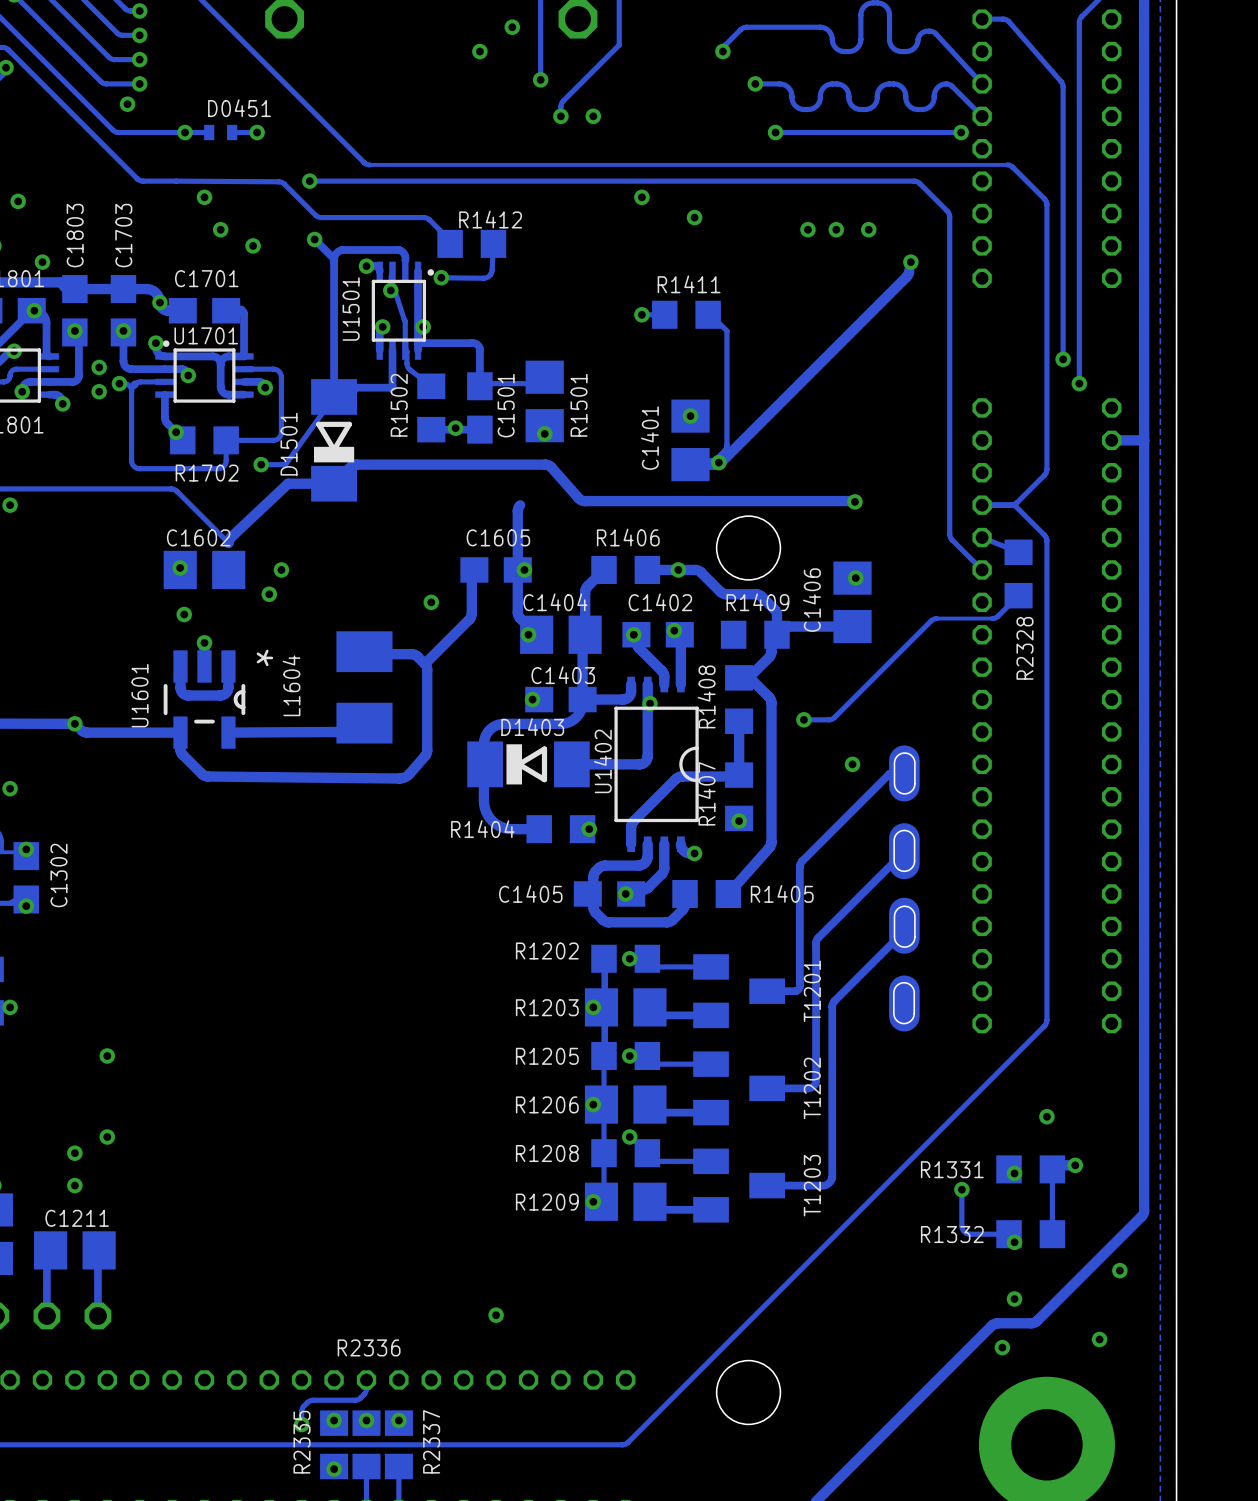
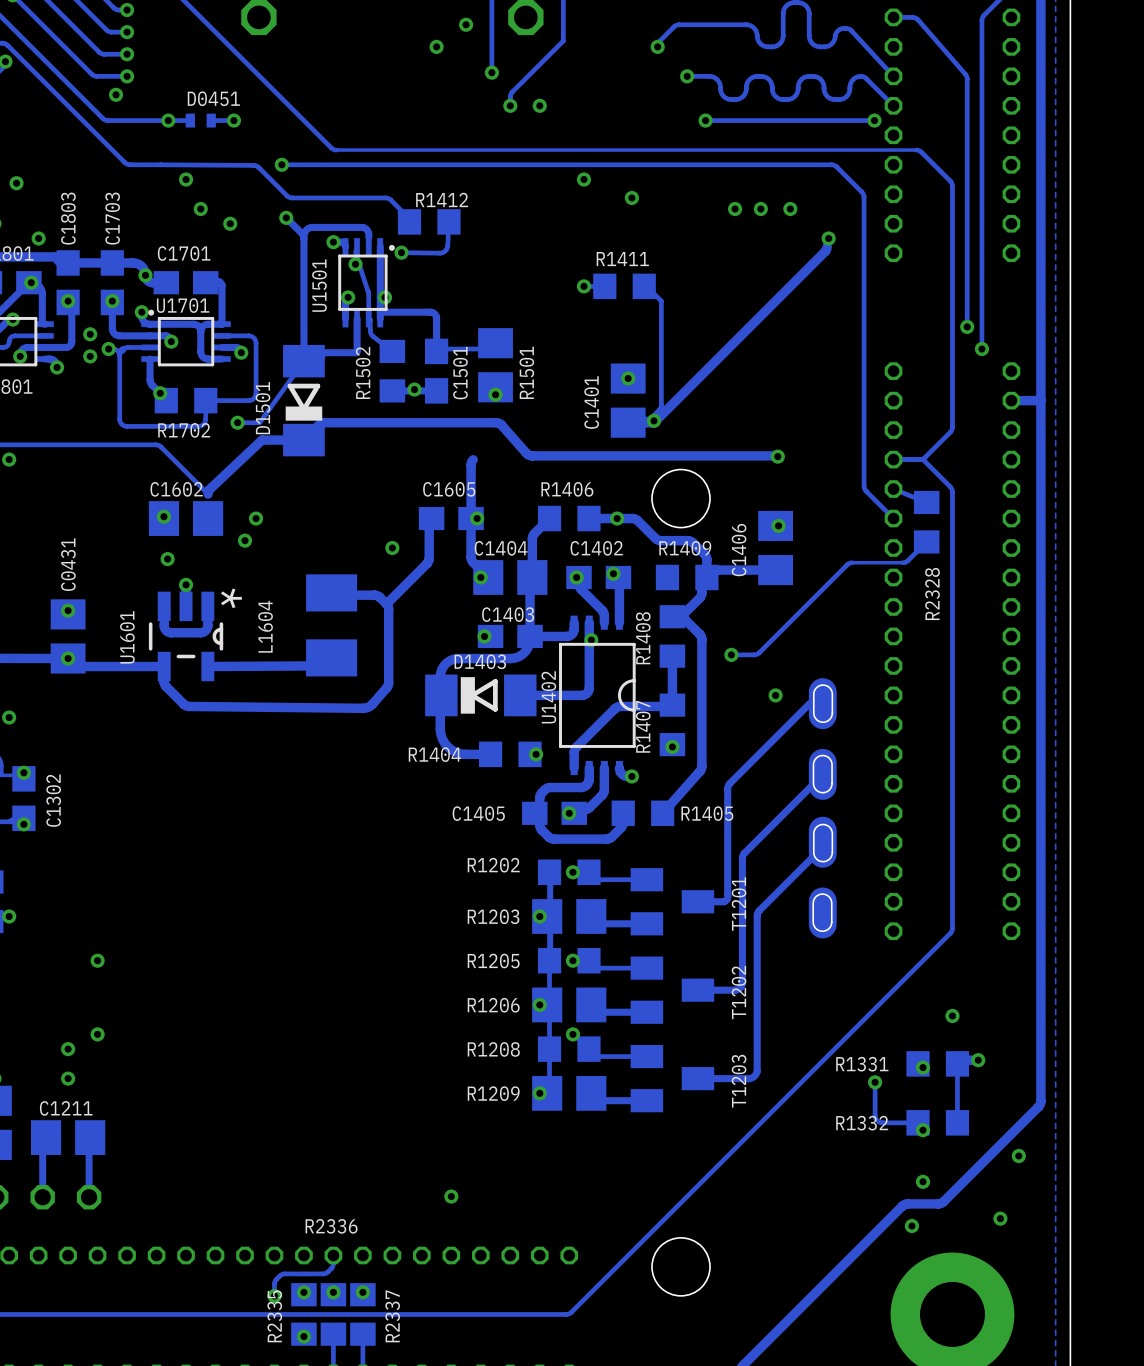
via: none -> (68, 610)
C0431: none -> (68, 636)

